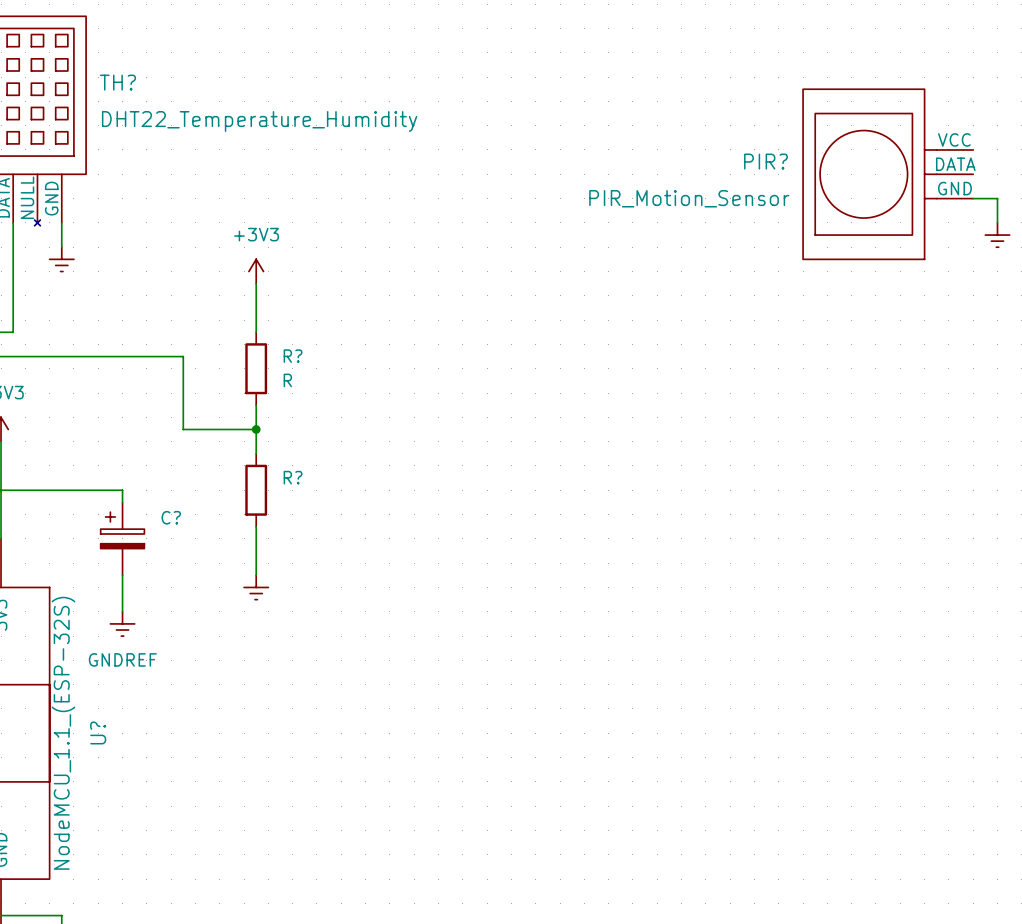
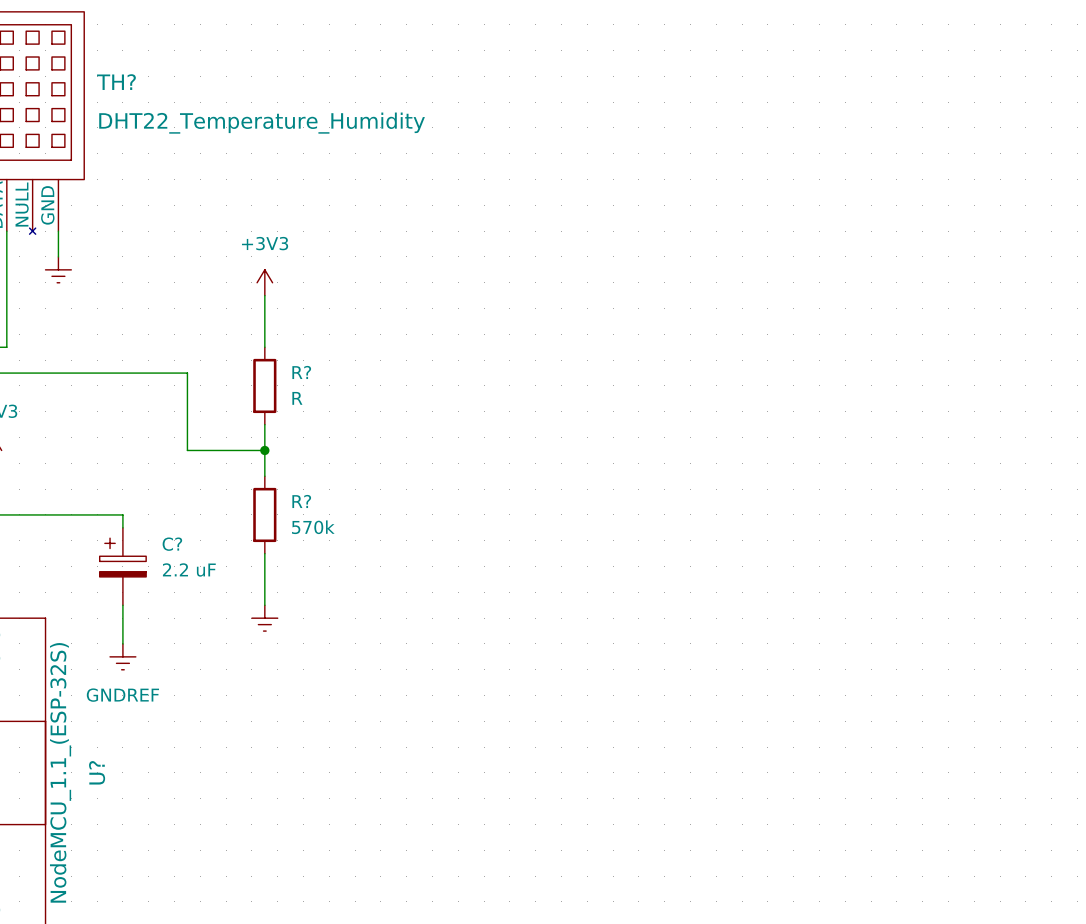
PIR?: PIR_Motion_Sensor (888, 174) -> none
wire: (973, 198) (997, 198) (997, 222) -> none
power symbol: (997, 235) -> none
R? value: none -> 570k (313, 527)
C? value: none -> 2.2 uF (189, 569)

